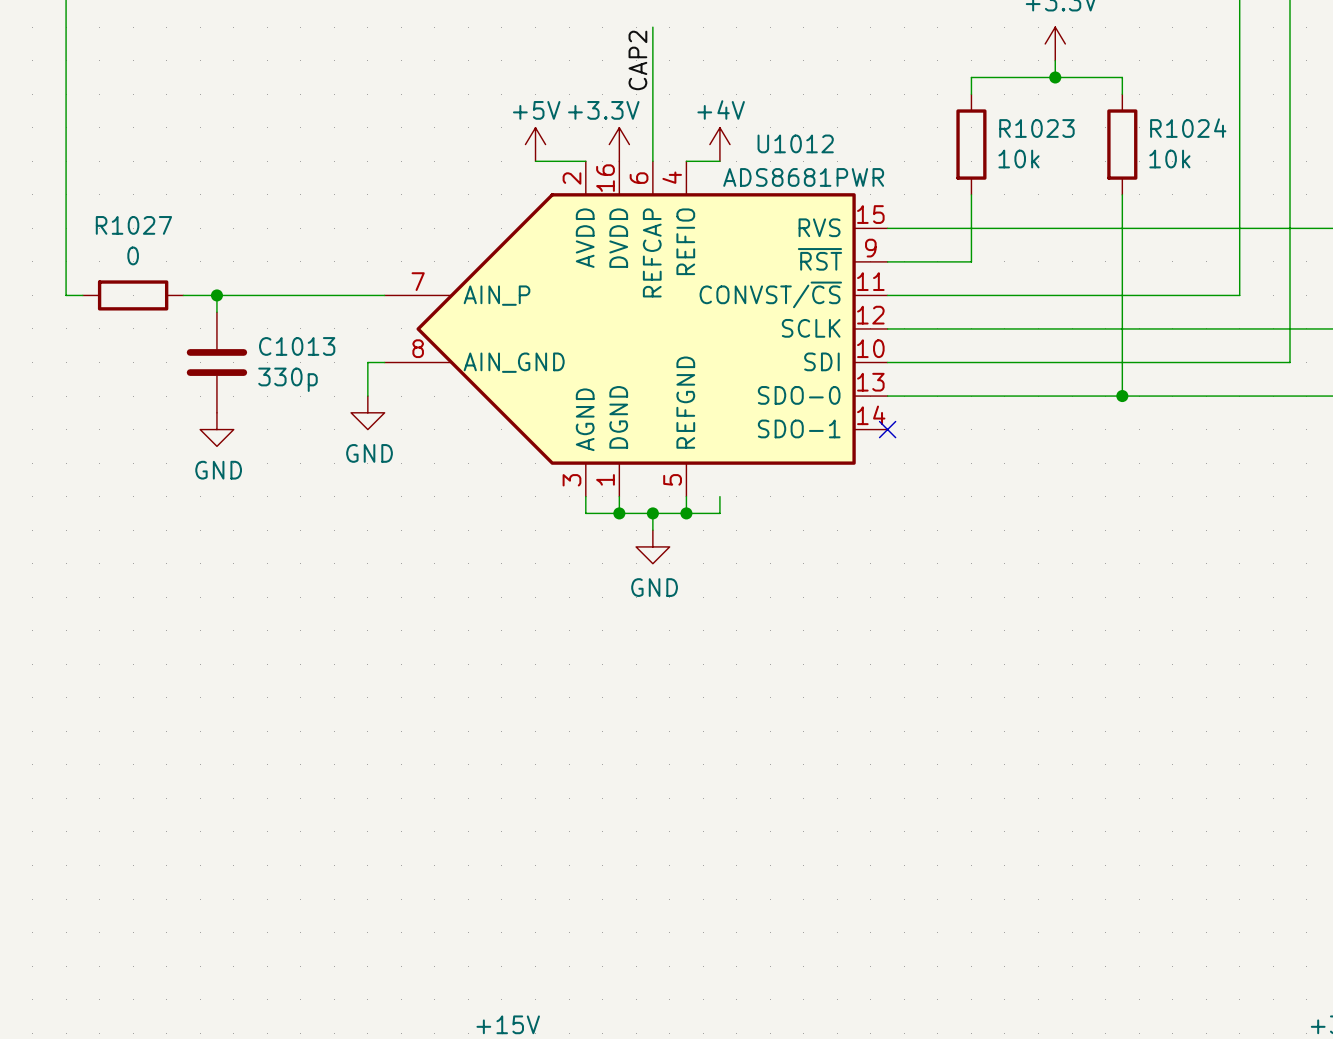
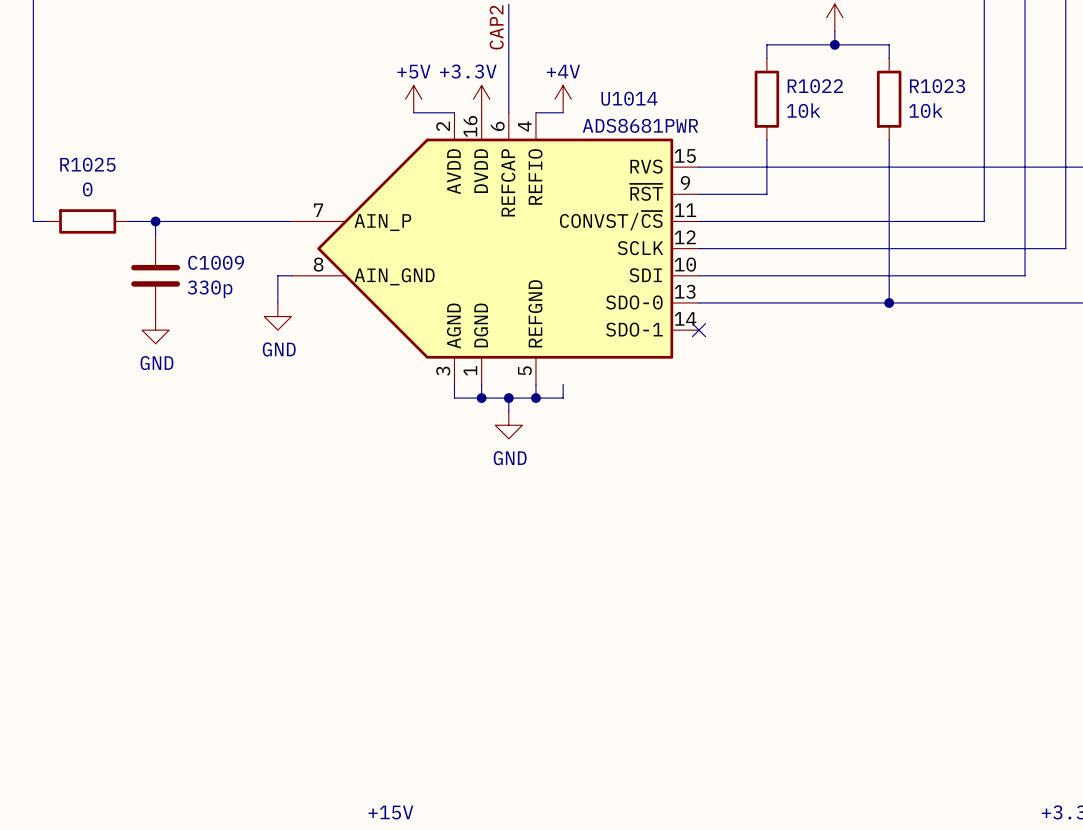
R1023 name: R1023 (1036, 128) -> R1022 (815, 86)
R1024 name: R1024 (1188, 128) -> R1023 (937, 86)
U1012 name: U1012 (795, 143) -> U1014 (629, 98)
R1027 name: R1027 (133, 225) -> R1025 (87, 164)
C1013 name: C1013 (297, 346) -> C1009 (216, 262)

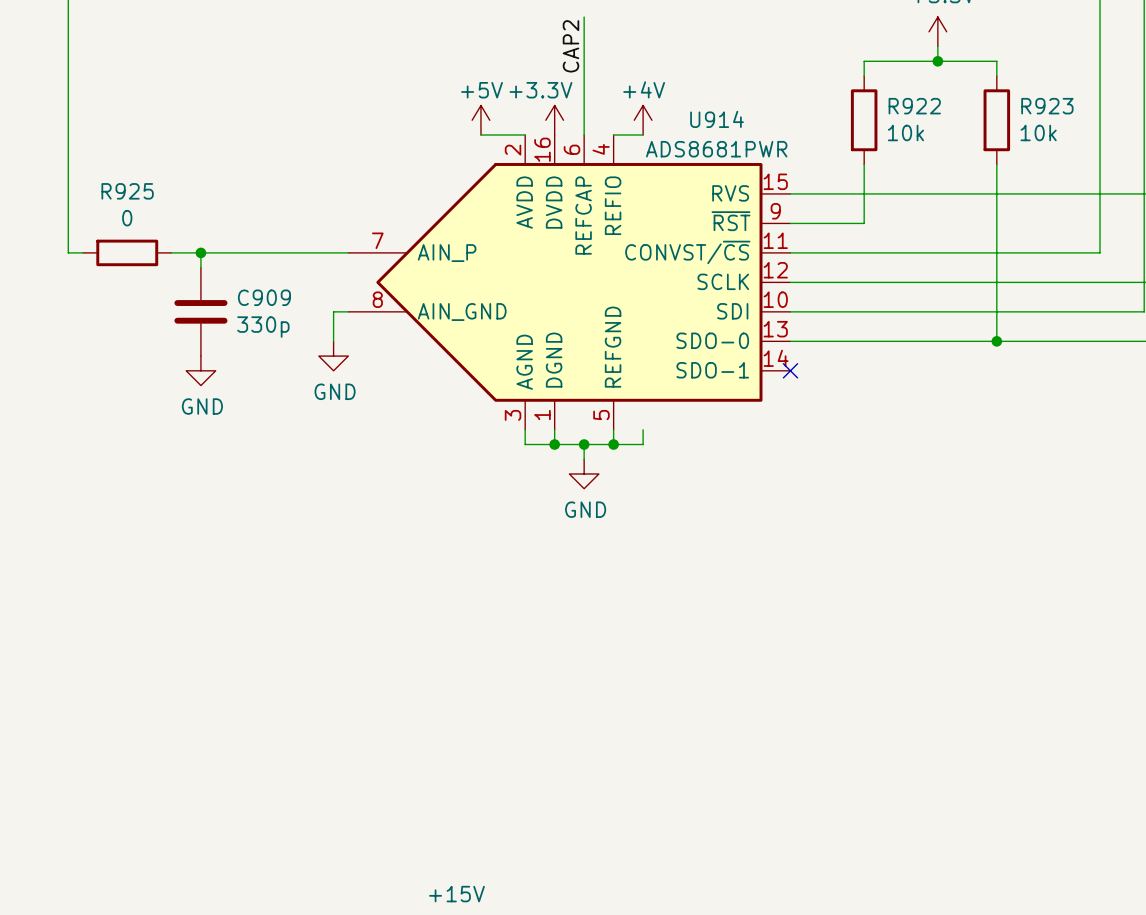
R1022 name: R1022 (815, 86) -> R922 (914, 106)
R1023 name: R1023 (937, 86) -> R923 (1047, 106)
U1014 name: U1014 (629, 98) -> U914 (717, 119)
R1025 name: R1025 (87, 164) -> R925 (127, 191)
C1009 name: C1009 (216, 262) -> C909 (264, 297)

